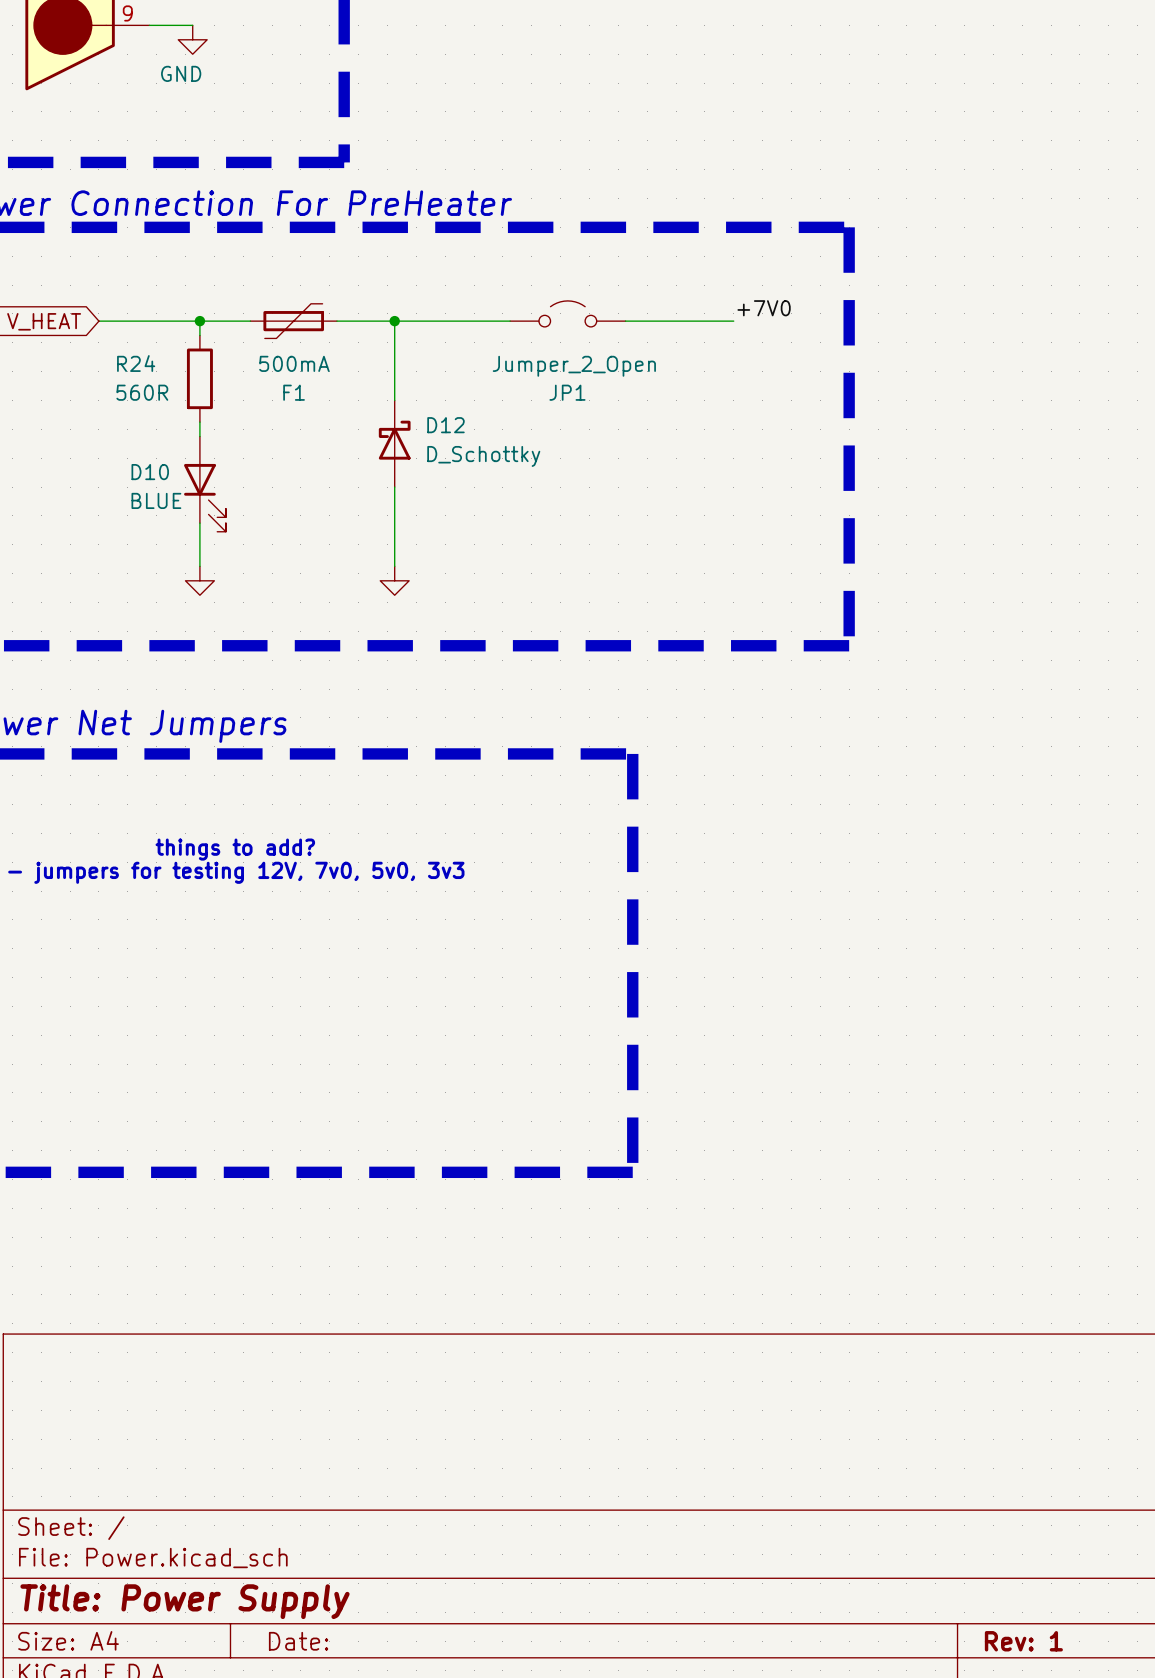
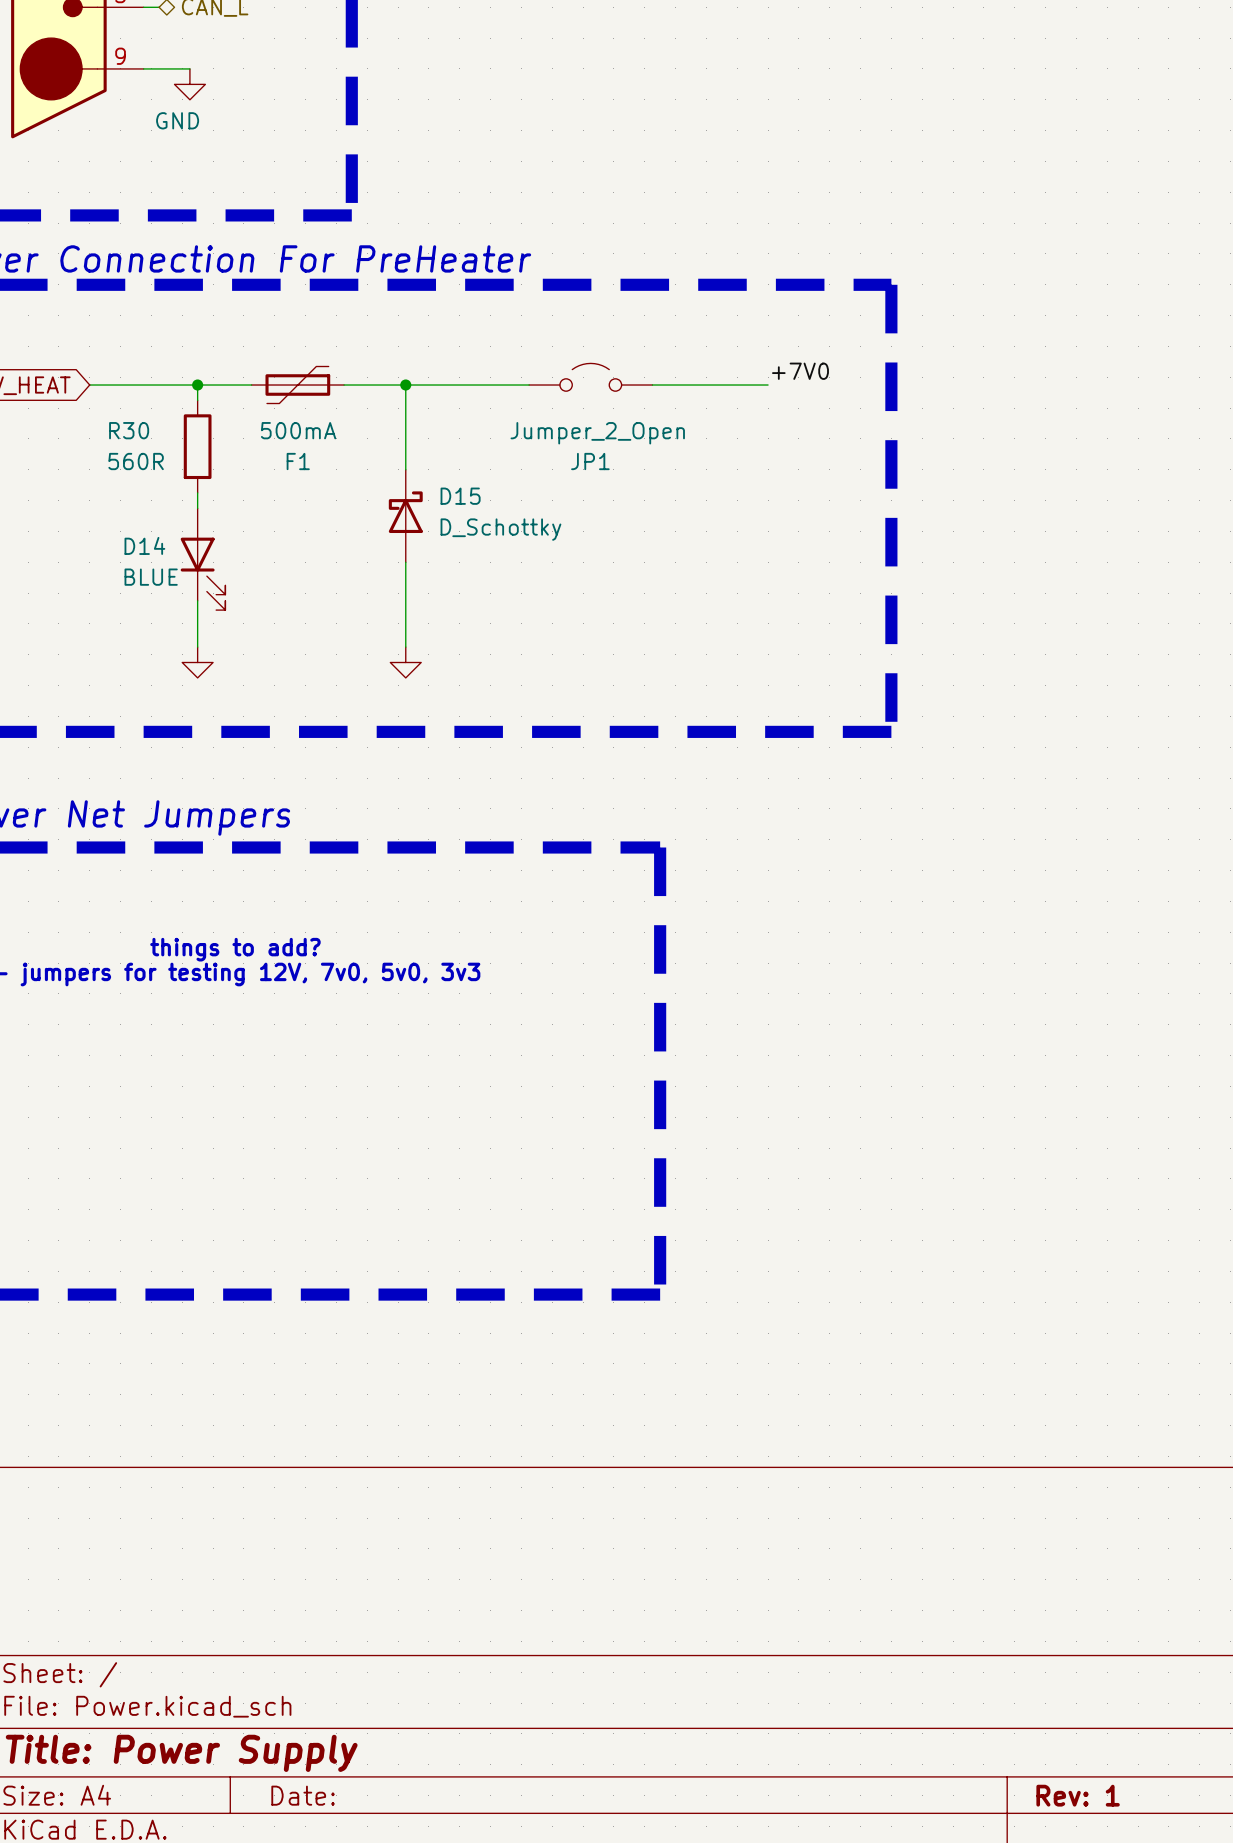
R24 name: R24 (136, 363) -> R30 (129, 430)
D12 name: D12 (445, 425) -> D15 (460, 496)
D10 name: D10 (150, 472) -> D14 (144, 545)

